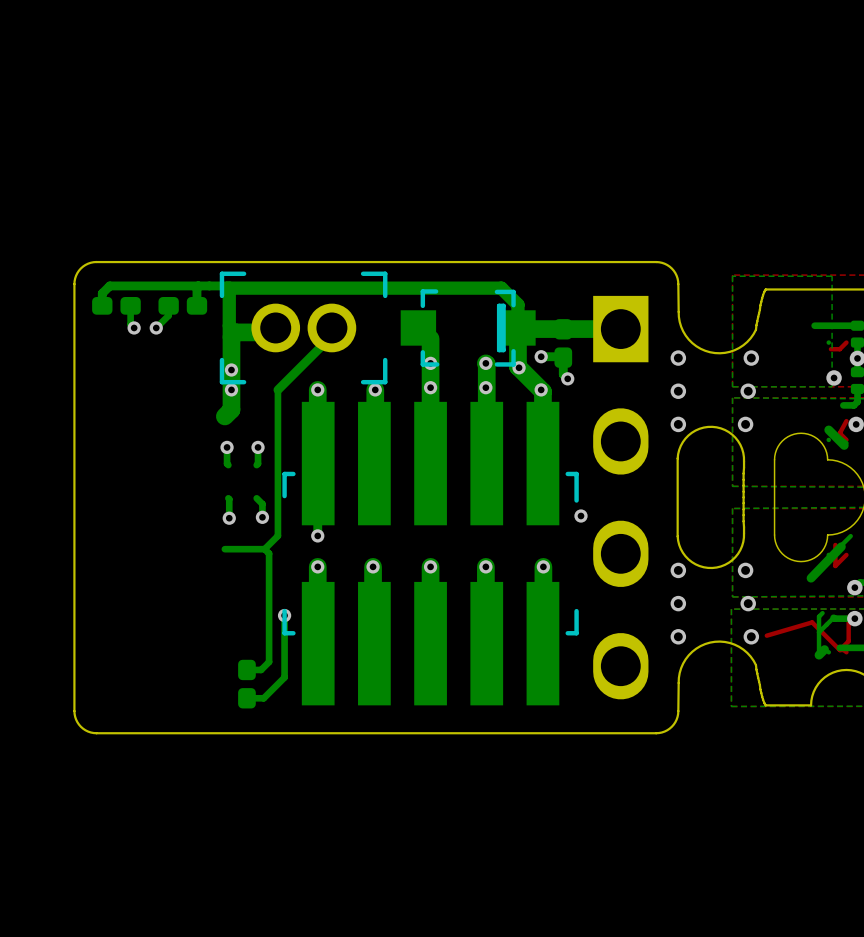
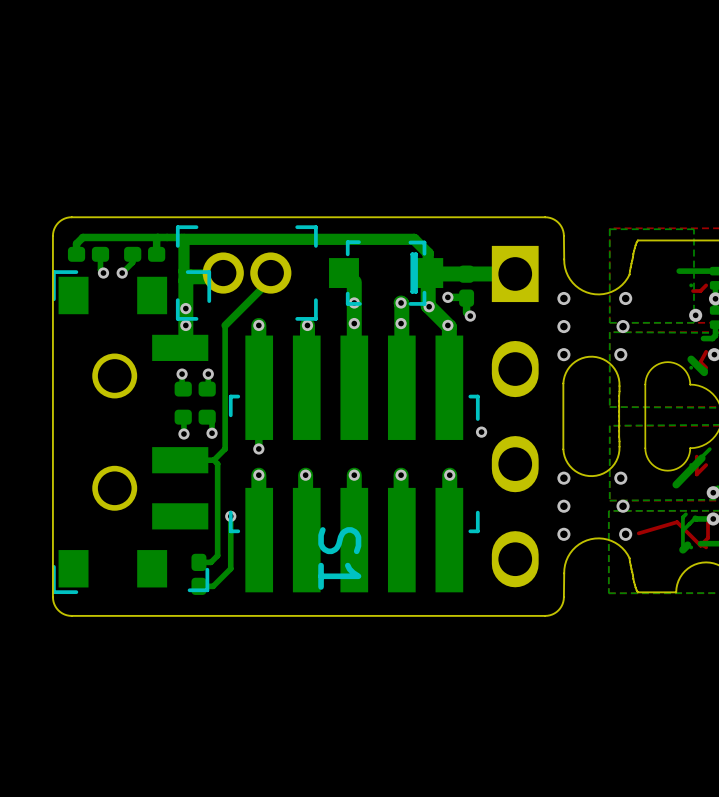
part: none -> (195, 389)
part: none -> (195, 417)
S1: none -> (131, 432)

